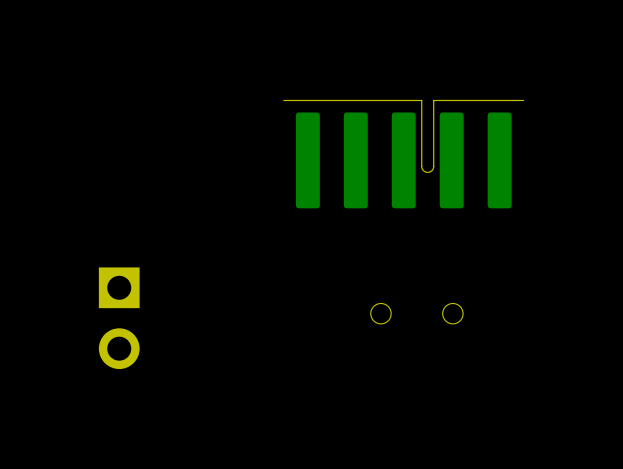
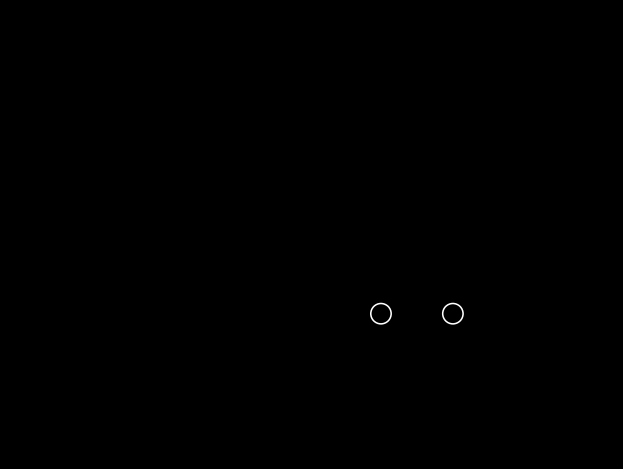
part: (403, 154) -> none
part: (119, 318) -> none

